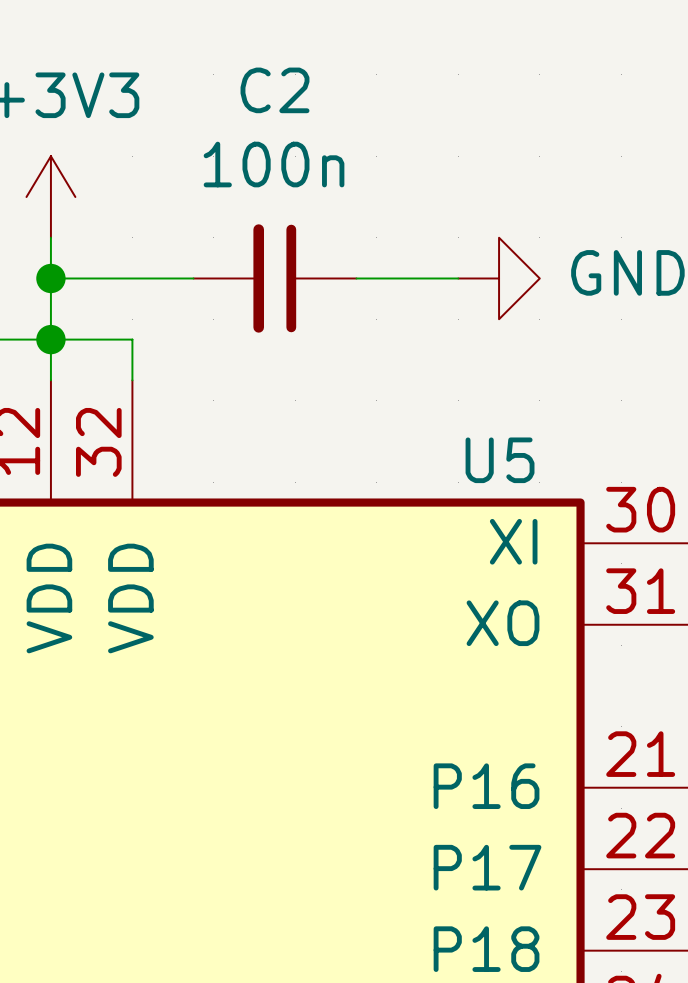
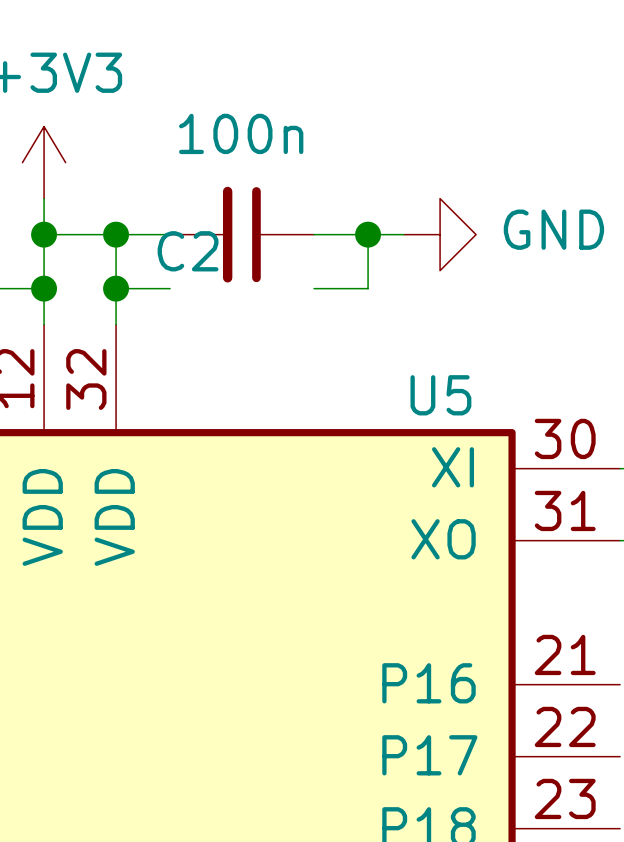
C2 name position: C2 (275, 90) -> C2 (188, 251)
wire: none -> (116, 234) (116, 288) (170, 288)
junction: none -> (116, 234)
wire: none -> (368, 234) (368, 288) (314, 288)
junction: none -> (368, 234)
wire: (50, 339) (132, 339) -> none
junction: none -> (116, 288)

